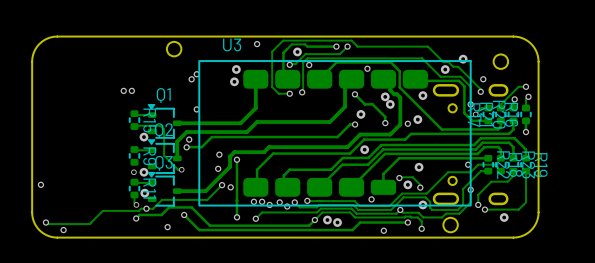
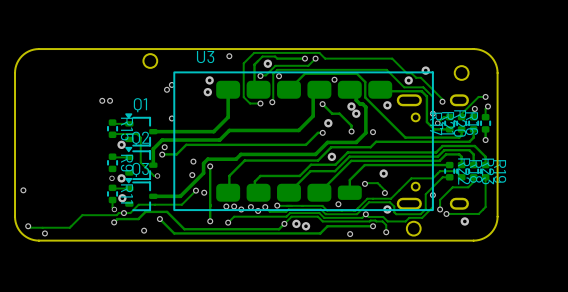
via: (483, 79) -> none
via: (417, 119) -> none
via: (468, 164) -> none
via: (407, 184) -> none

